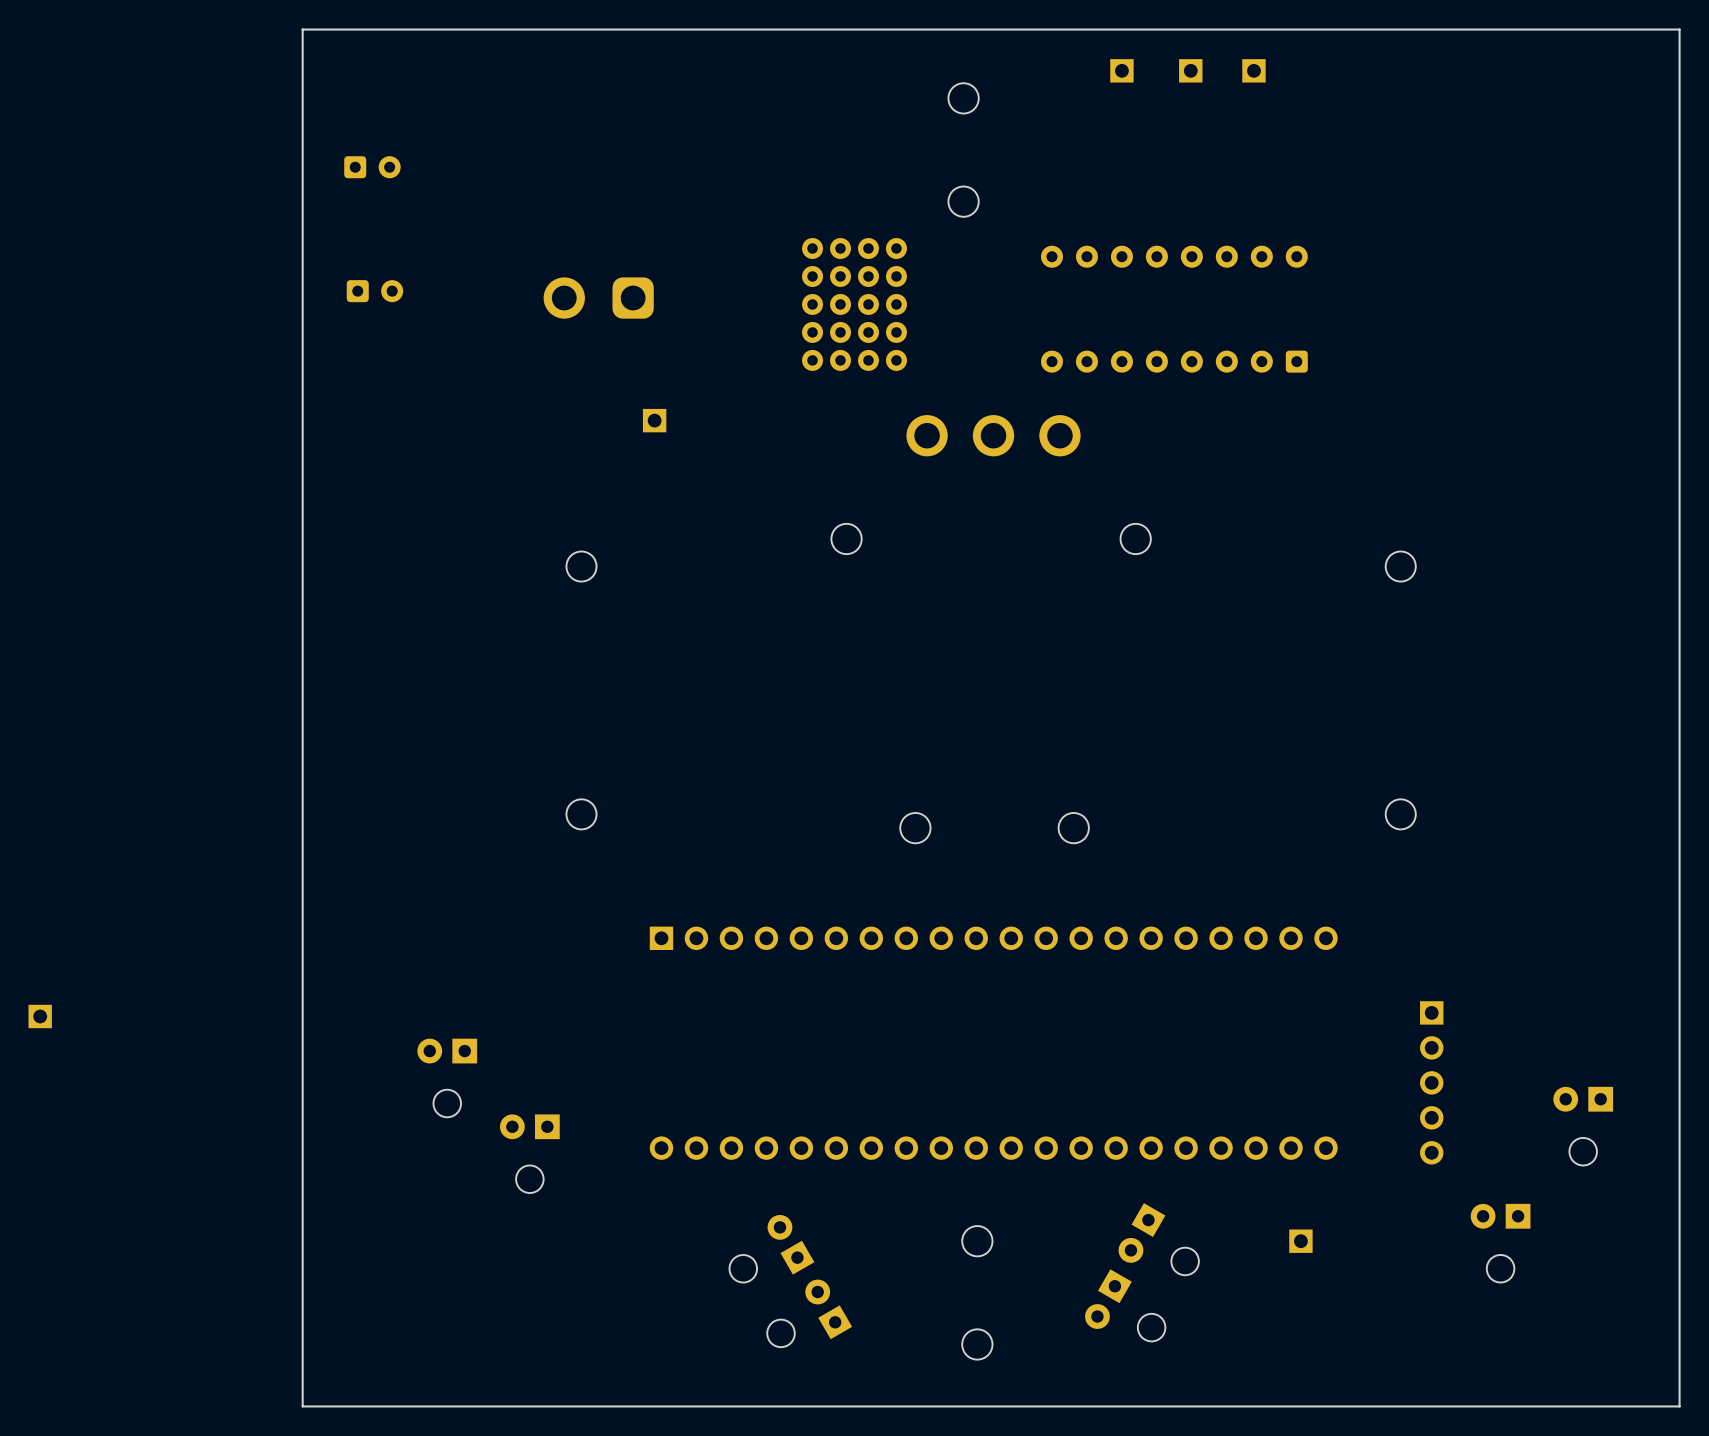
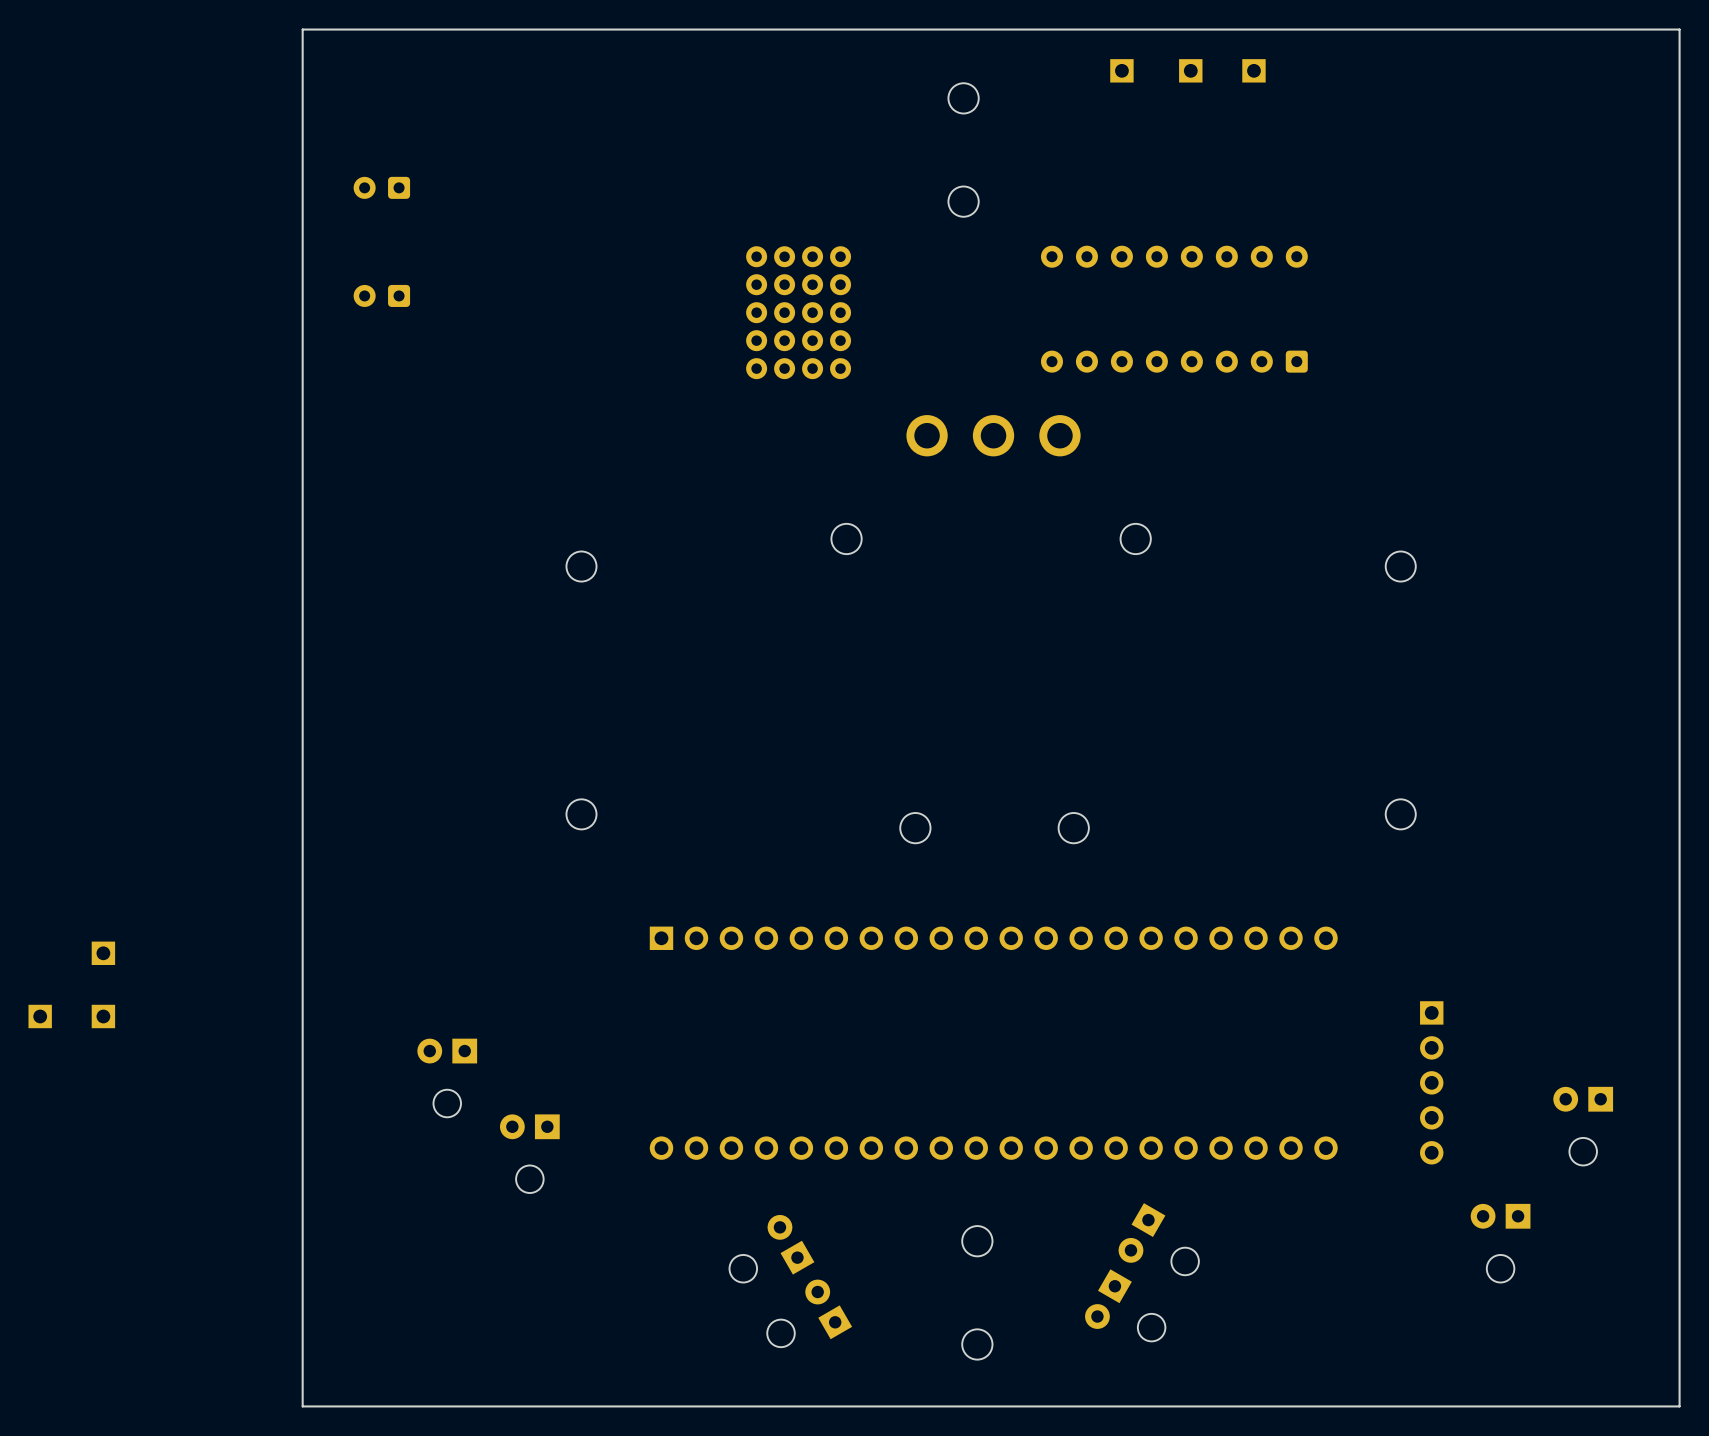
part rotation: 0° (372, 167) -> 180° (381, 187)
part rotation: 0° (374, 291) -> 180° (381, 295)
part: (598, 298) -> none
part position: (854, 304) -> (798, 312)
part: (654, 420) -> none
part: none -> (103, 953)
part: none -> (103, 1016)
part: (1300, 1241) -> none

